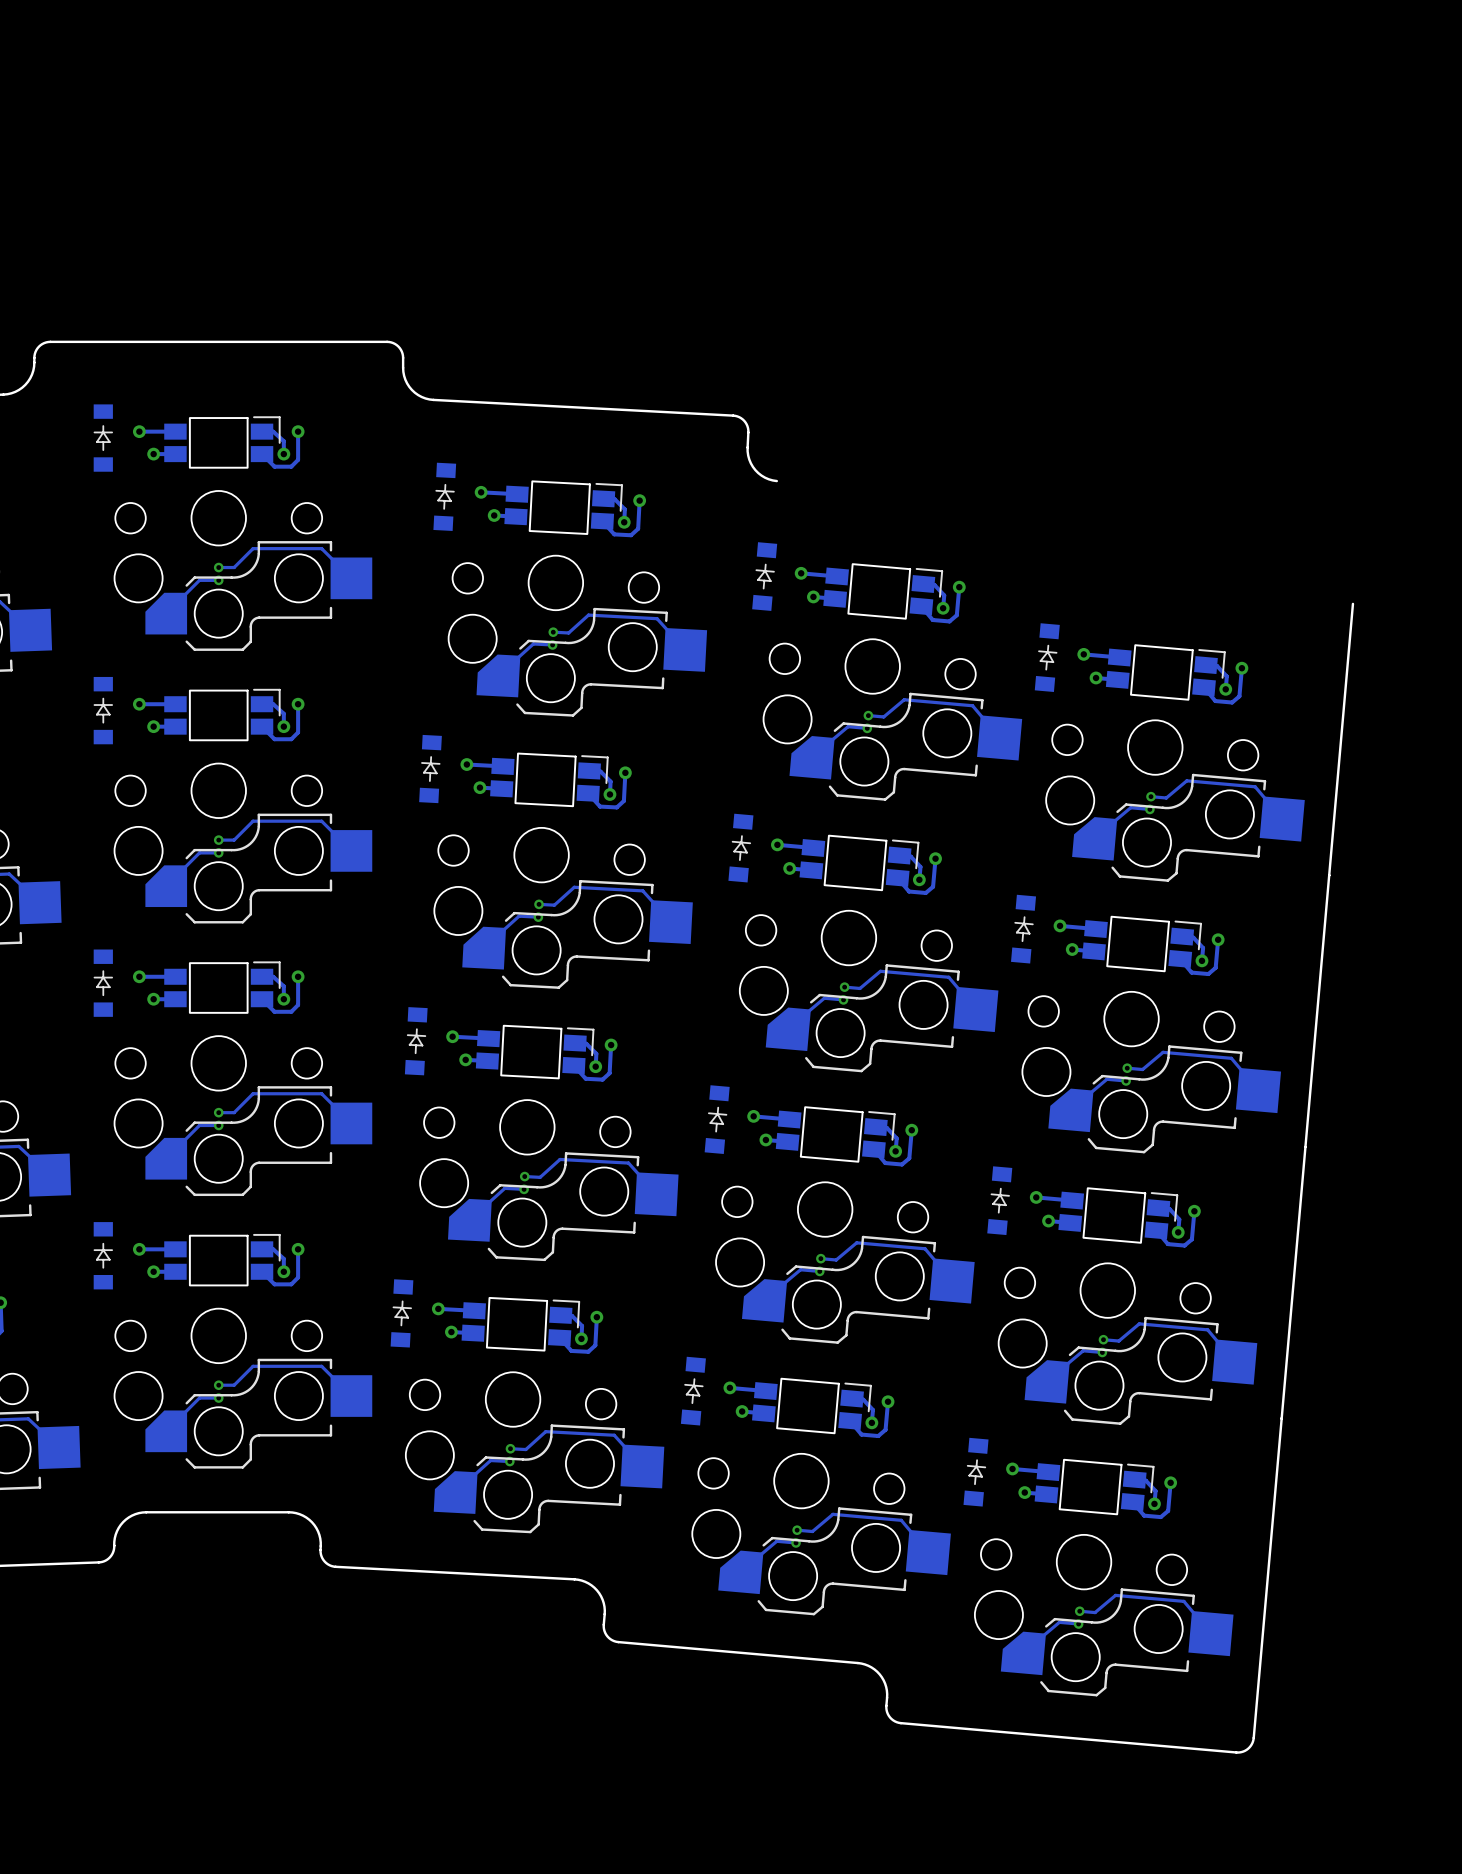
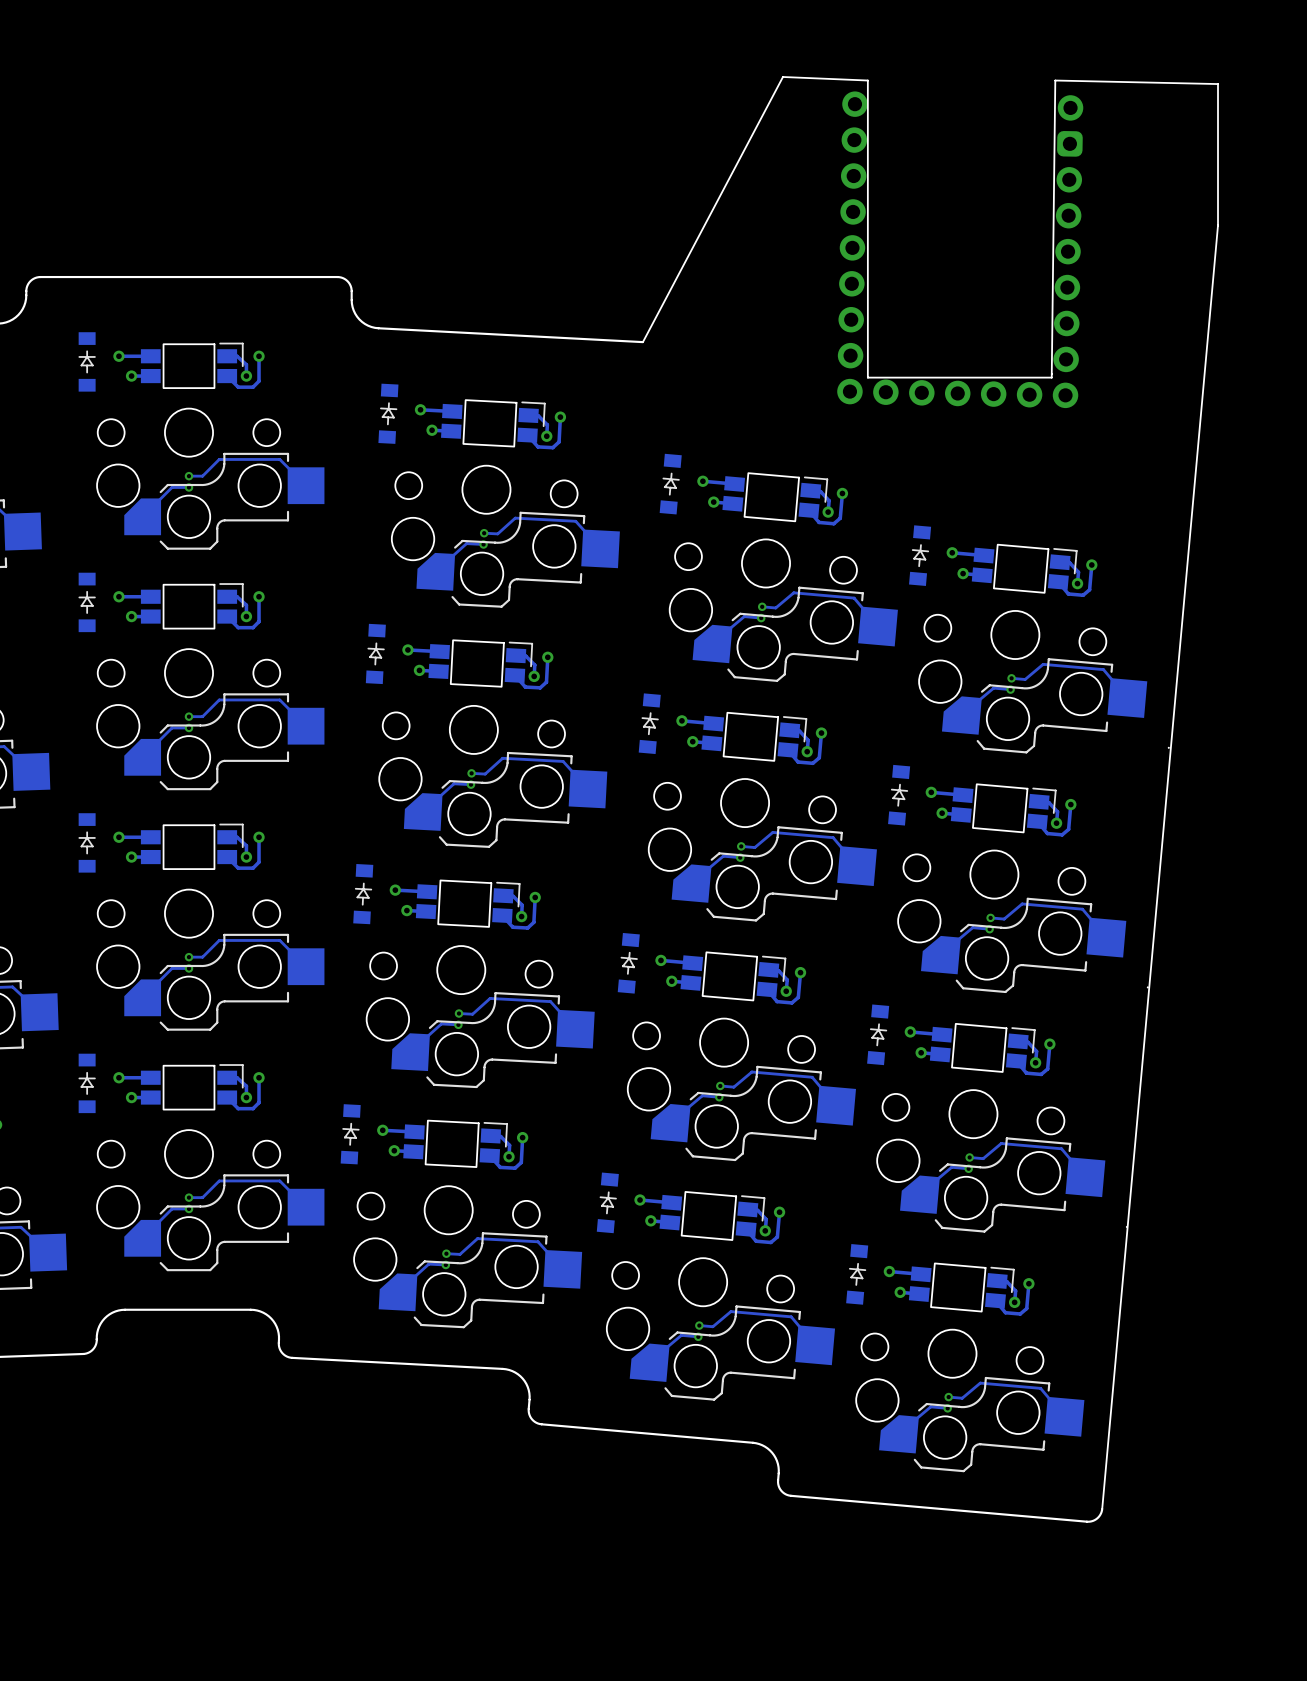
part: none -> (960, 249)
board edge: (733, 415) (742, 419) (747, 426) (747, 451) (752, 466) (765, 477) (776, 481) -> none
board edge: (1352, 603) (1253, 1737) -> (642, 342) (782, 76) (867, 80) (867, 377) (1051, 377) (1055, 80) (1218, 84) (1218, 225) (1102, 1508)

